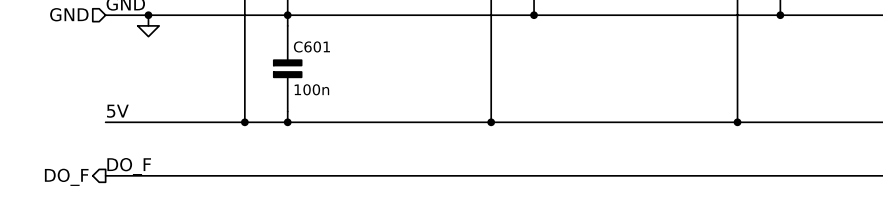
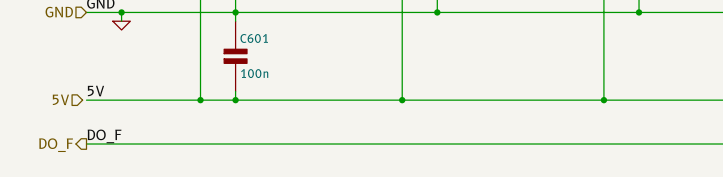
hierarchical label: none -> 5V (60, 99)

